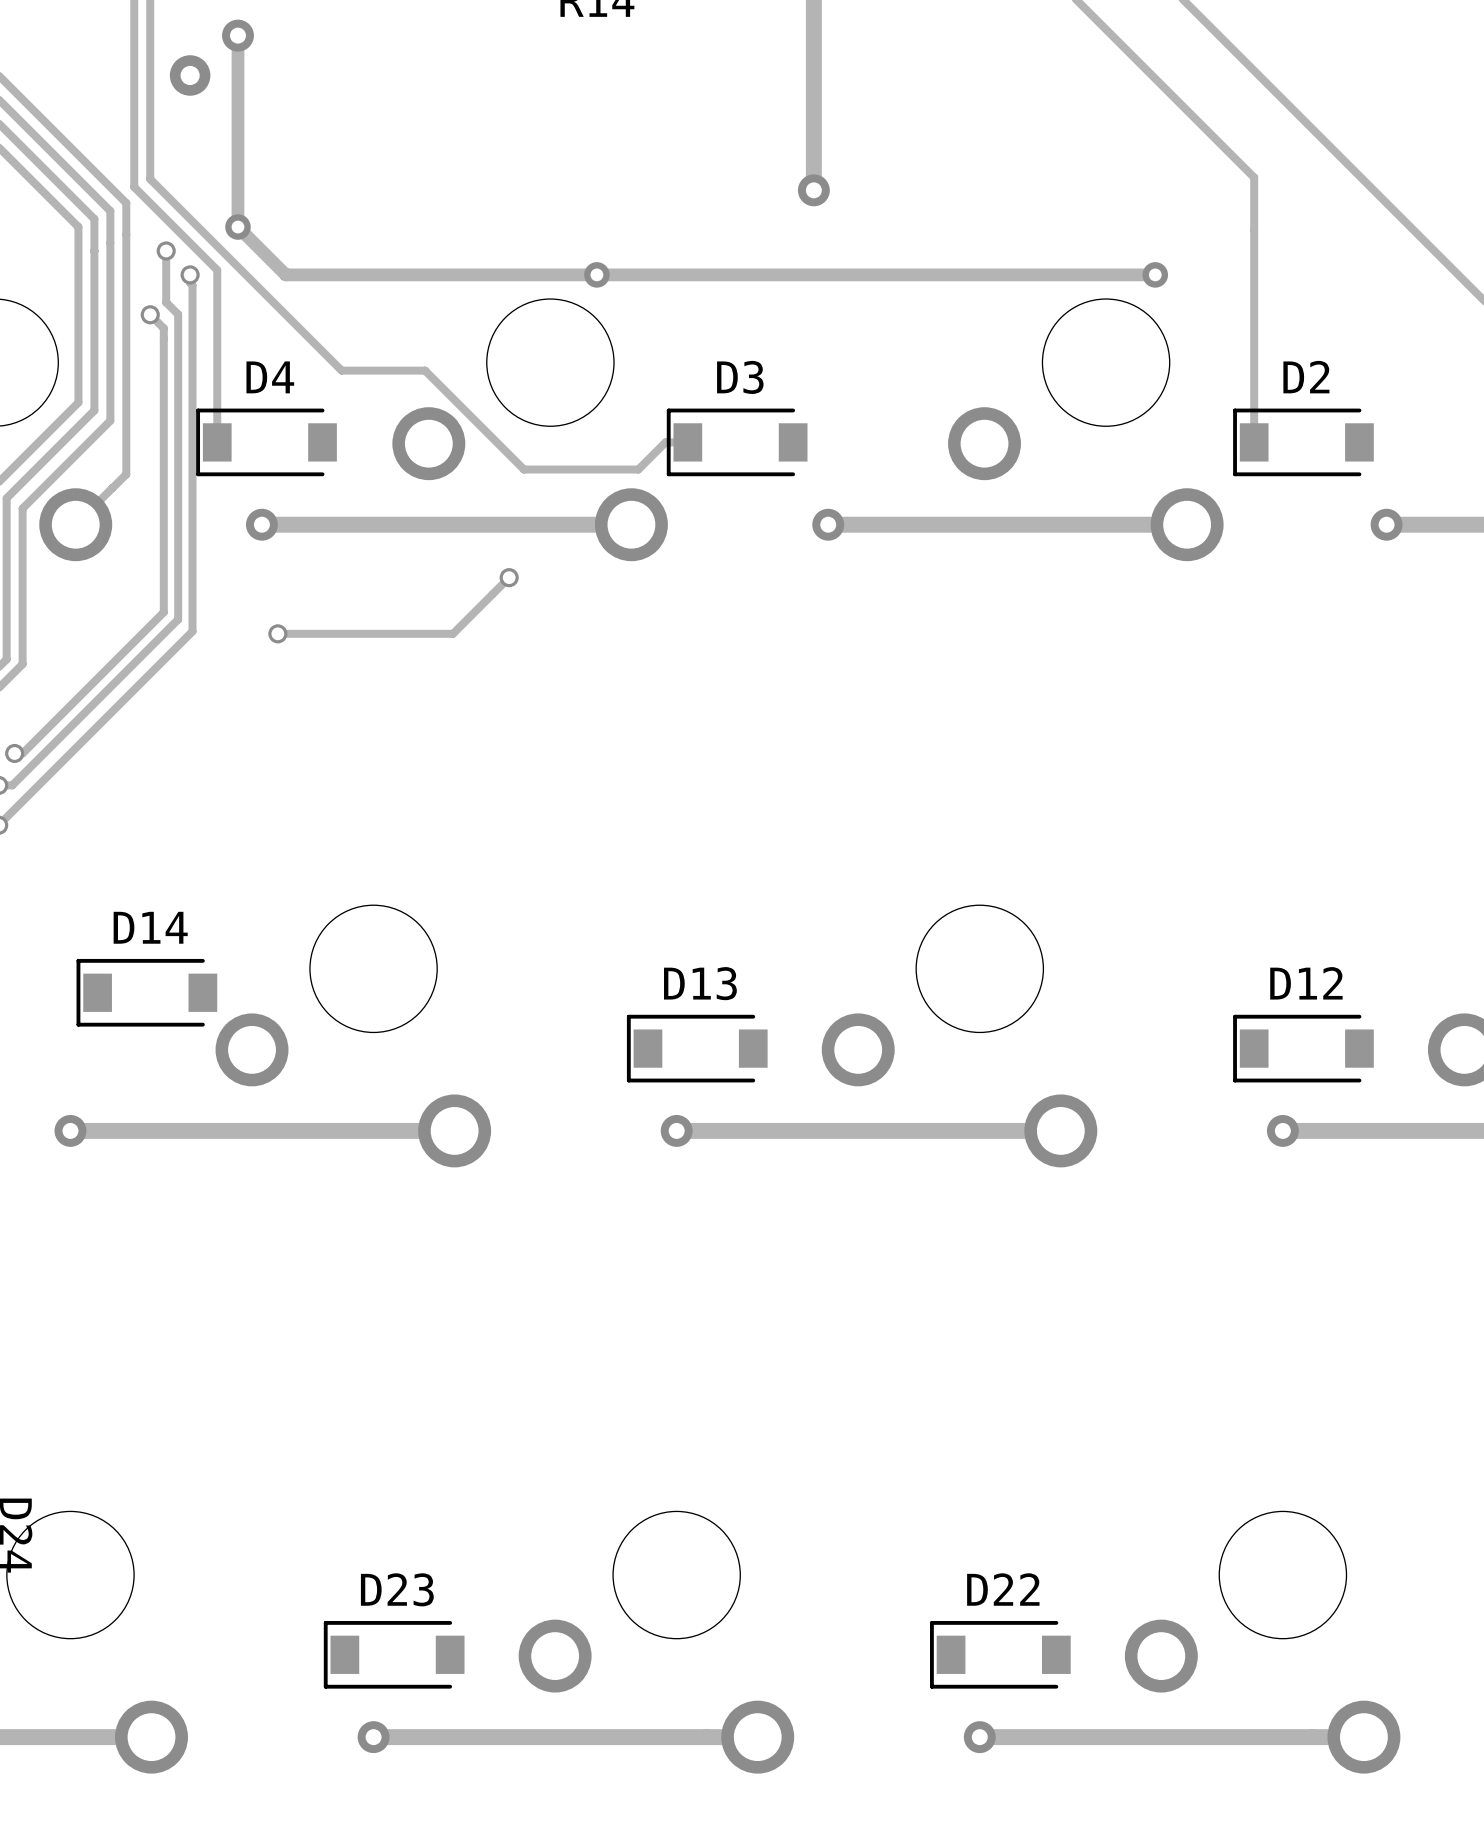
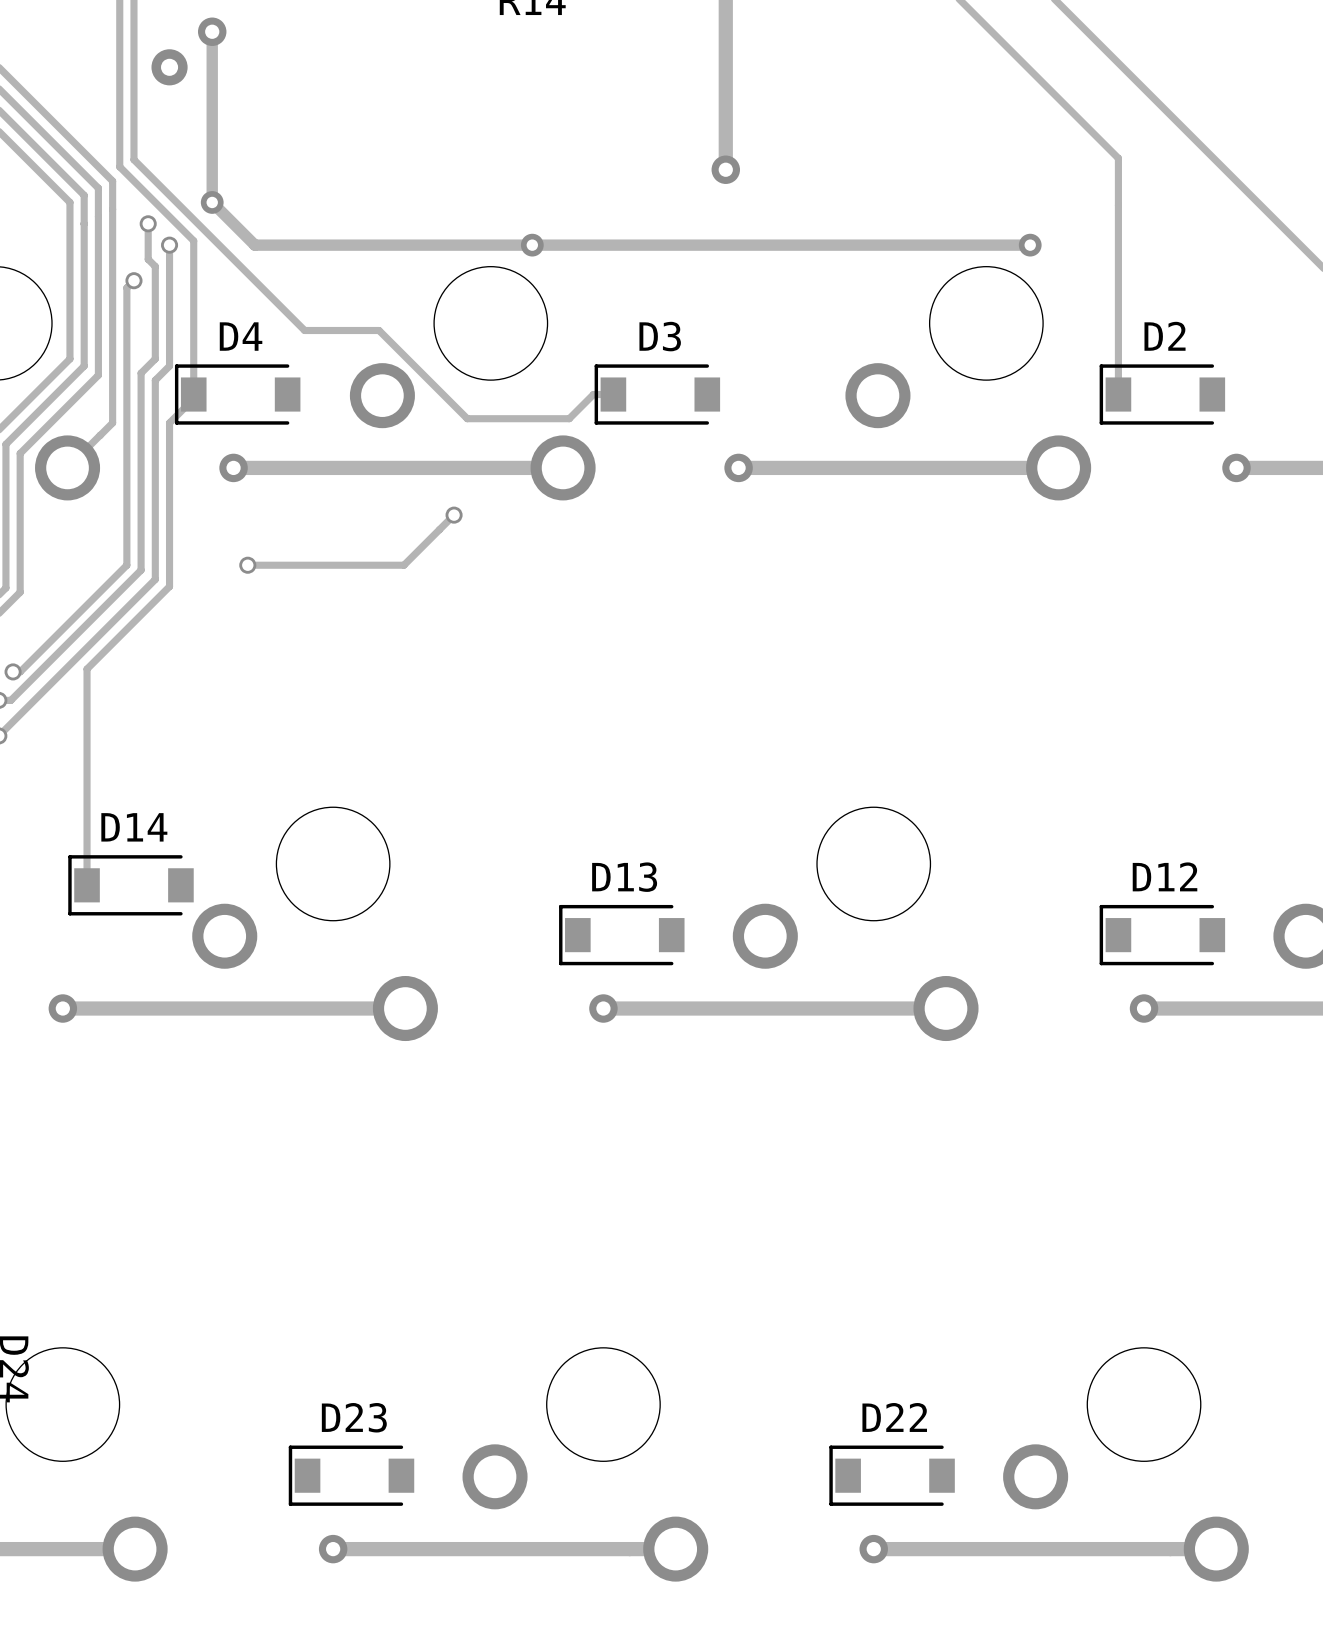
track: (190, 282) (192, 285) (192, 631) (174, 649) -> (169, 252) (169, 366) (155, 380) (155, 579)
track: (166, 290) (166, 302) (178, 314) (178, 619) (158, 639) -> (148, 259) (155, 266) (155, 358) (141, 373) (141, 570)
track: (150, 314) (163, 328) (163, 612) (142, 633) -> (133, 280) (126, 287) (126, 565)
track: none -> (193, 394) (193, 398) (169, 422) (169, 586) (87, 669) (87, 885)

